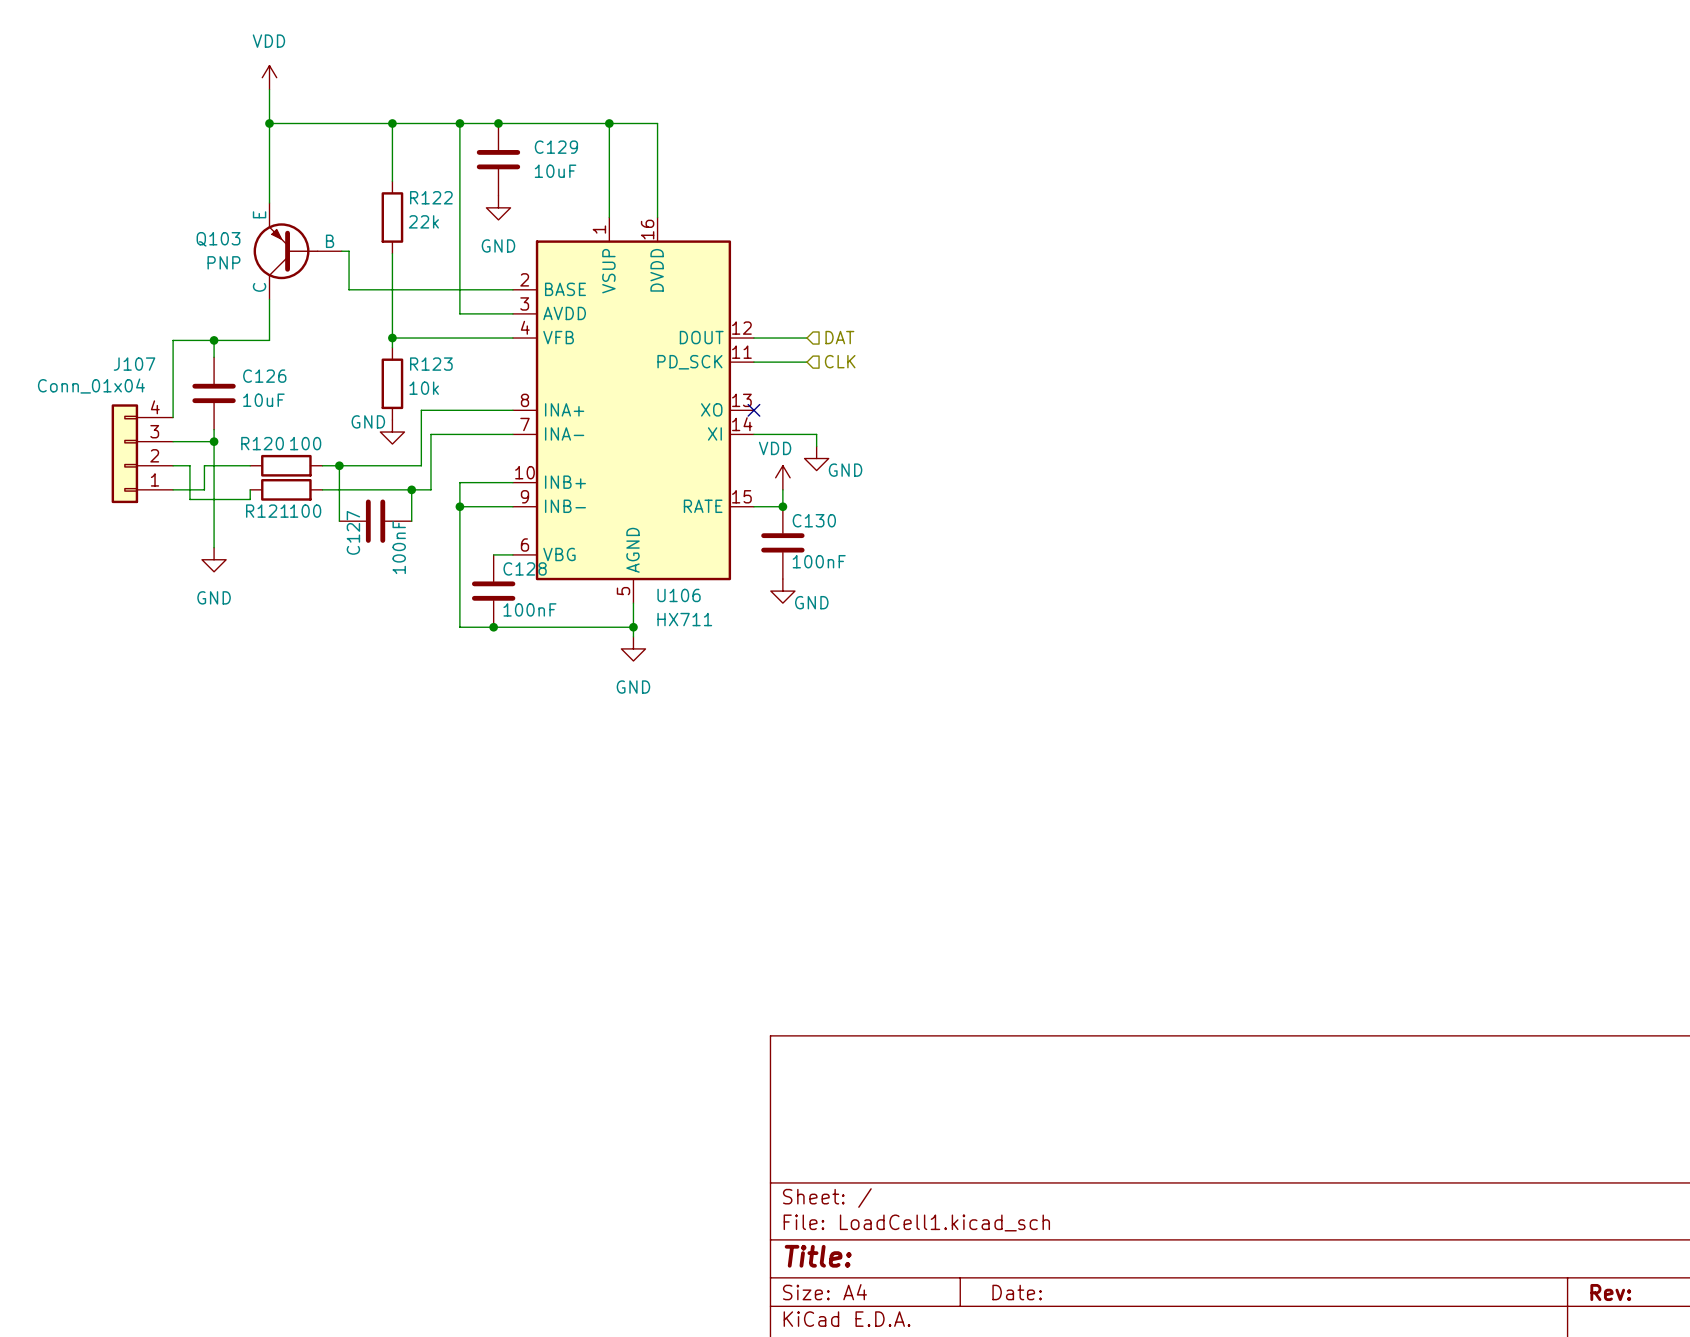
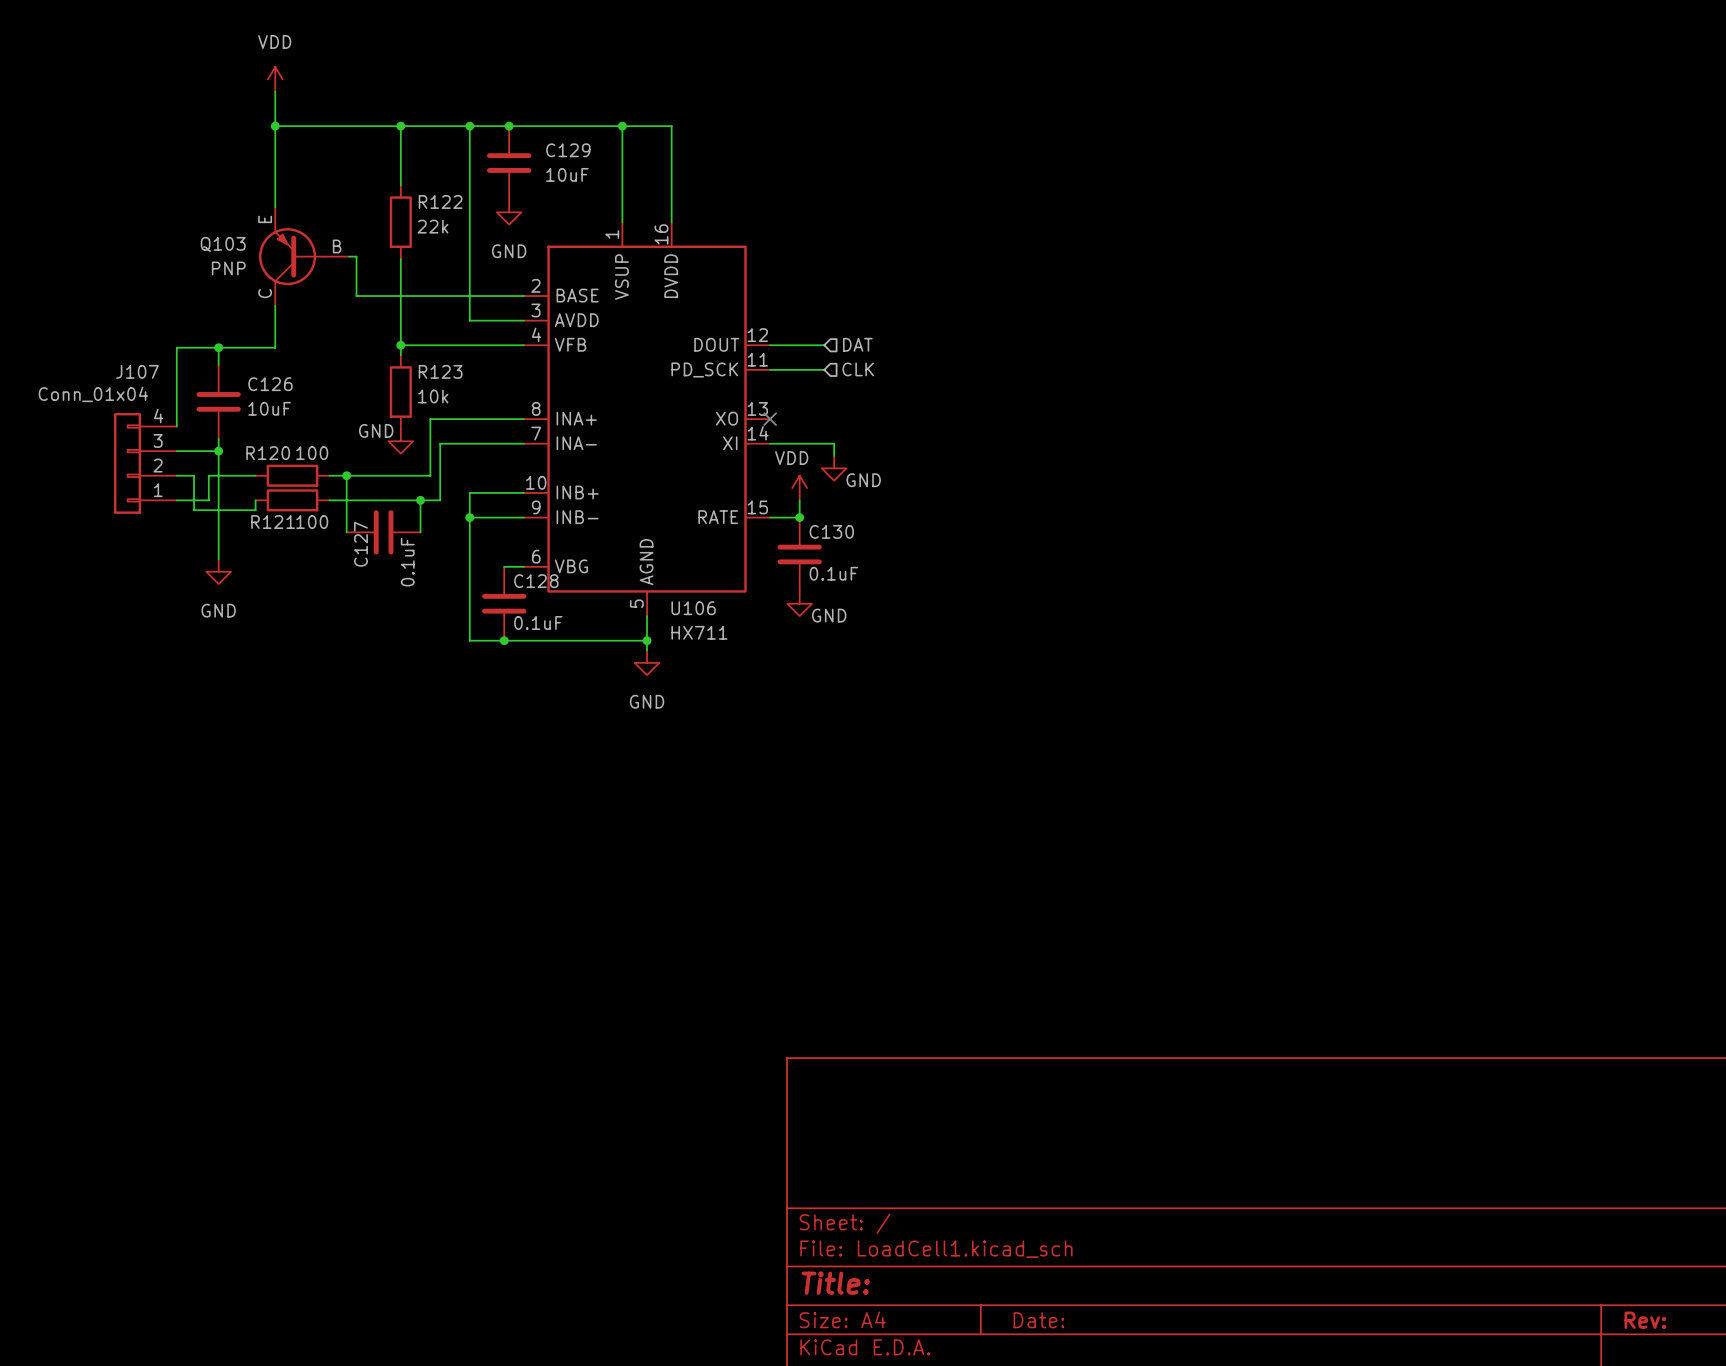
C127 value: 100nF (399, 547) -> 0.1uF (407, 562)
C130 value: 100nF (819, 561) -> 0.1uF (833, 573)
C128 value: 100nF (529, 609) -> 0.1uF (538, 622)

